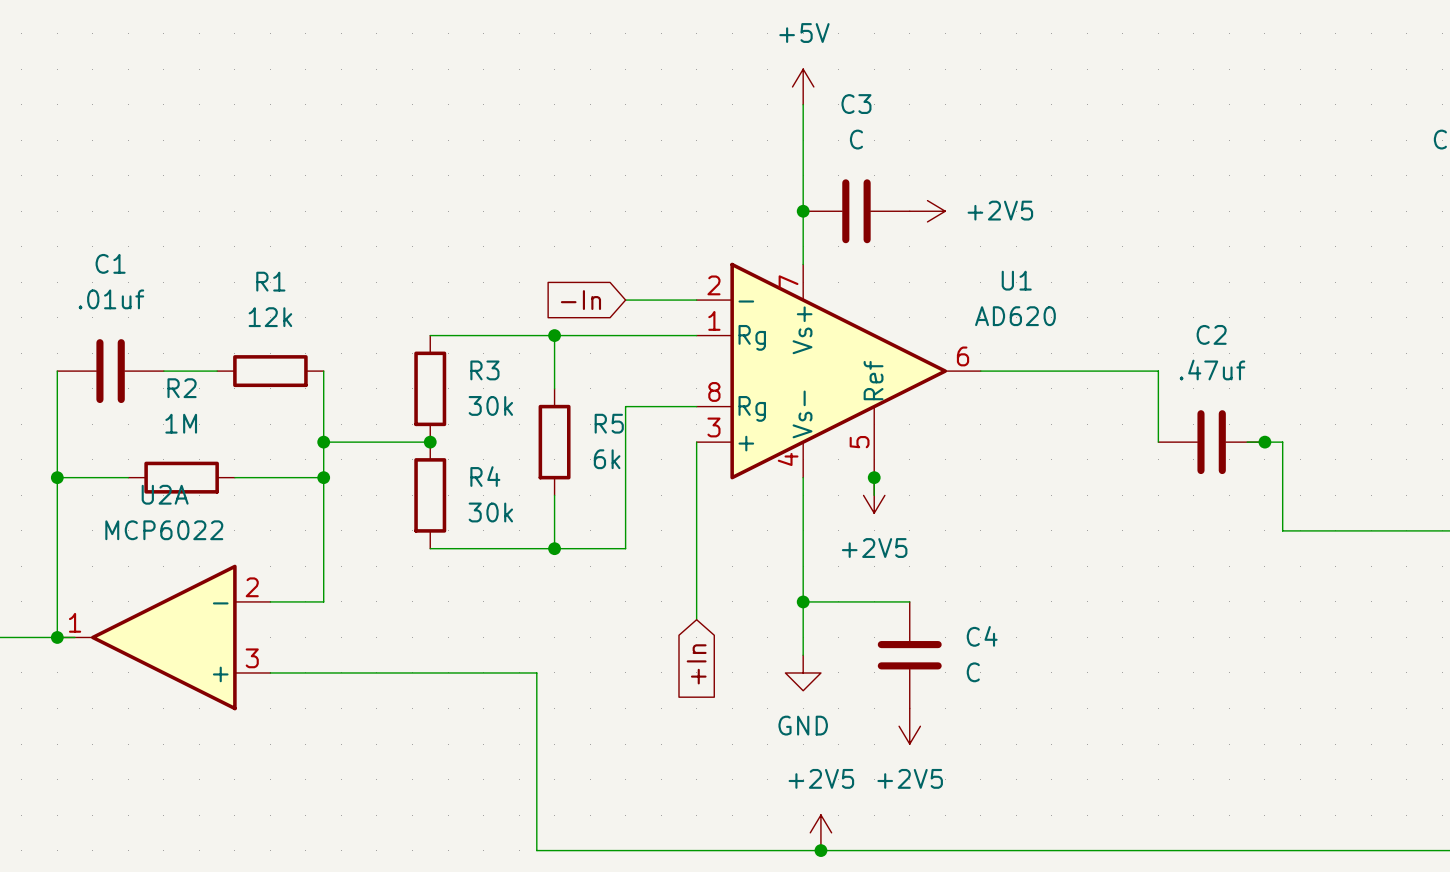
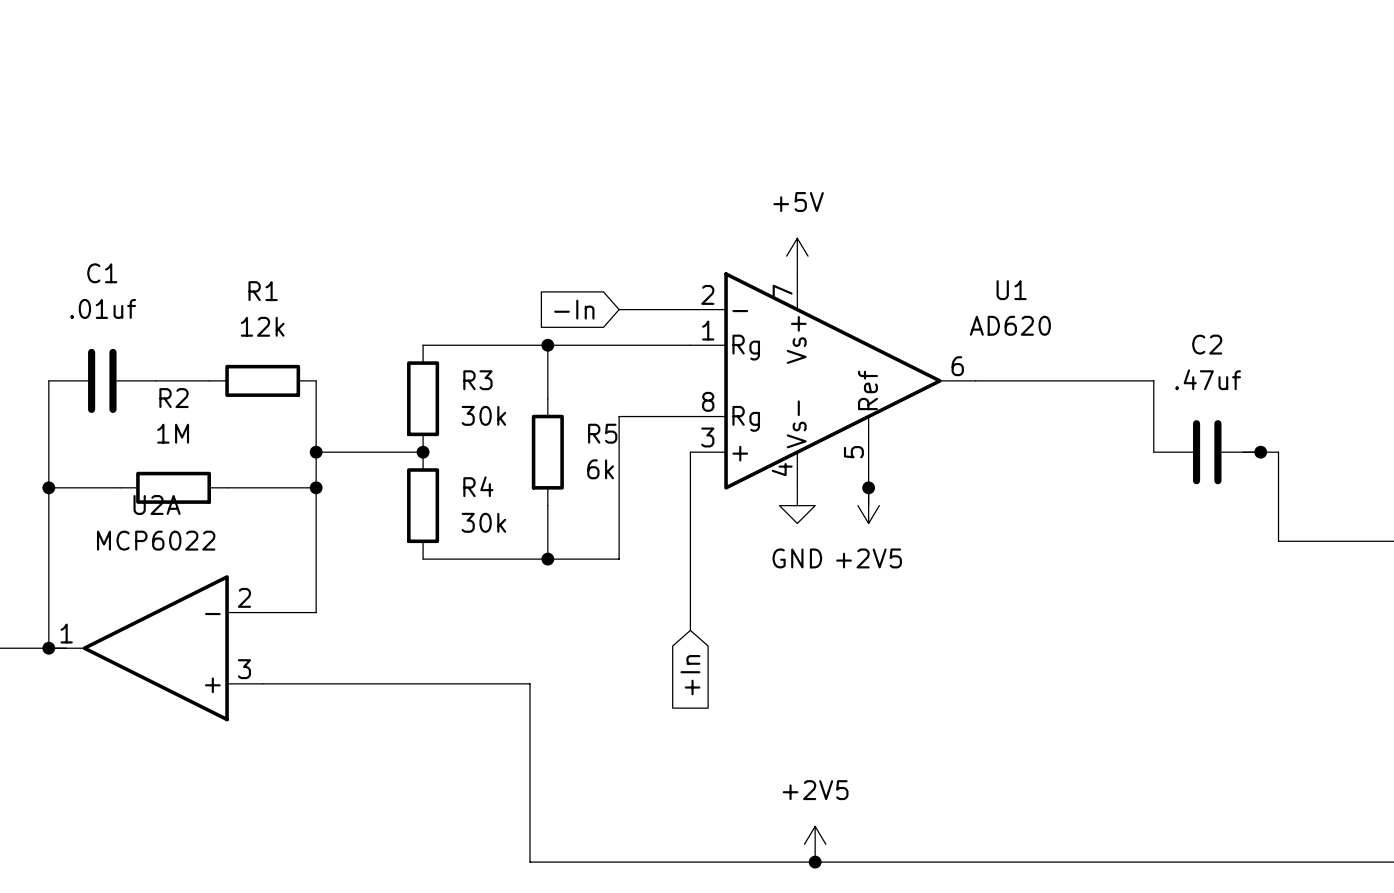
power symbol position: +5V (803, 86) -> +5V (797, 256)
wire: (803, 104) (803, 264) -> none
junction: (803, 211) -> none
C3: C (856, 211) -> none
power symbol: +2V5 (927, 211) -> none
wire: (803, 477) (803, 655) -> none
wire: (803, 601) (909, 601) -> none
junction: (803, 601) -> none
C4: C (909, 655) -> none
power symbol position: GND (803, 672) -> GND (797, 505)
power symbol: +2V5 (909, 726) -> none

